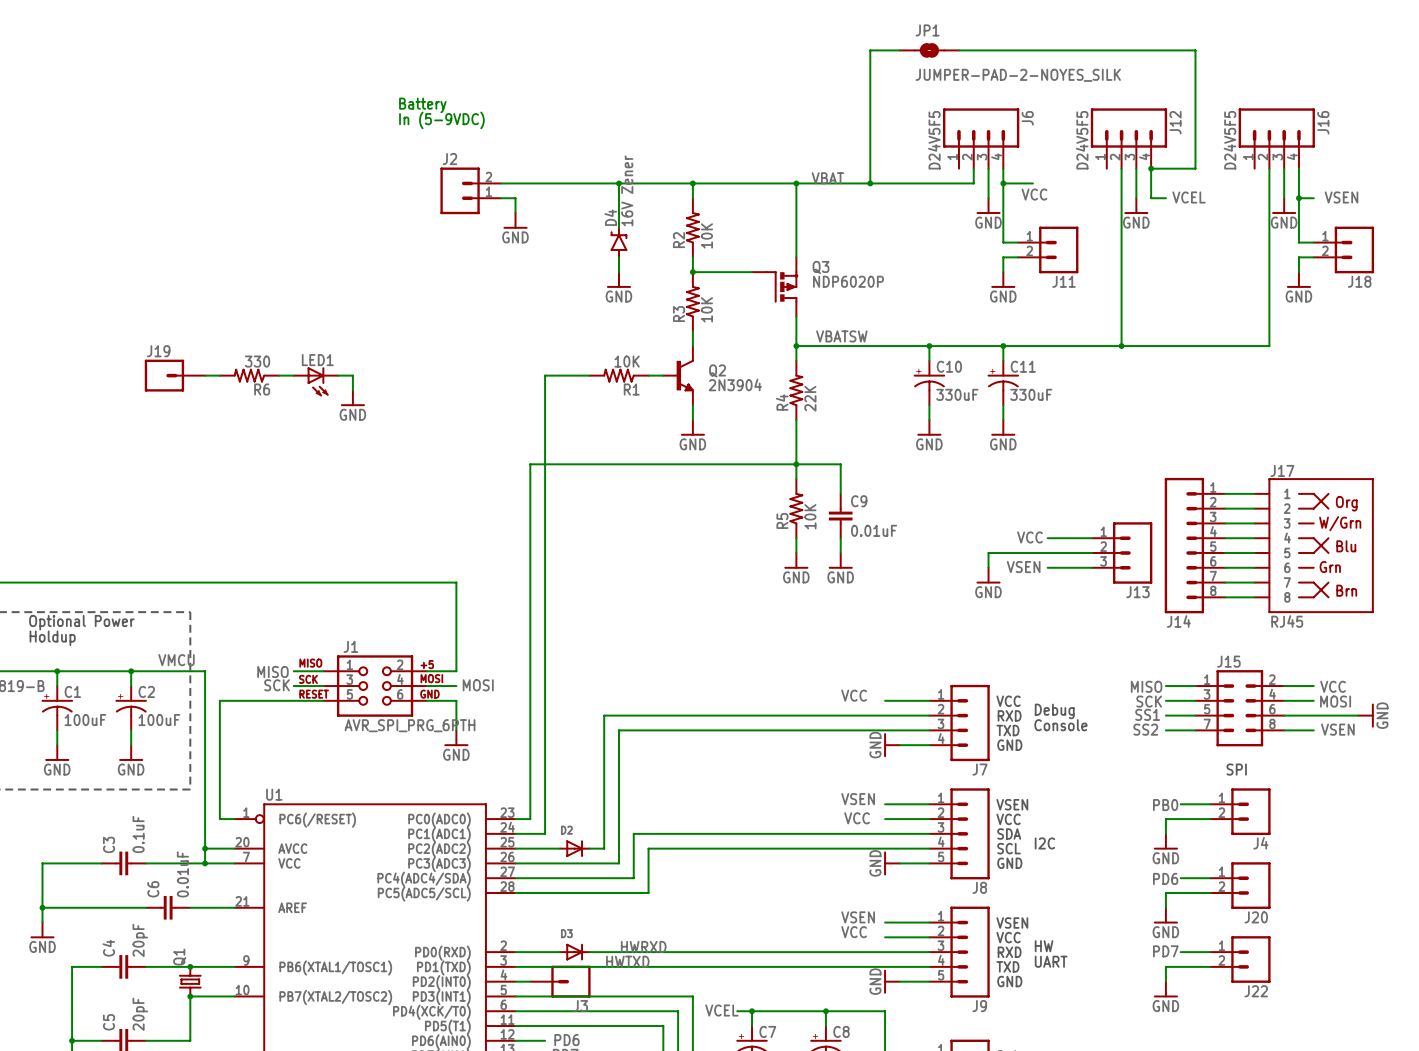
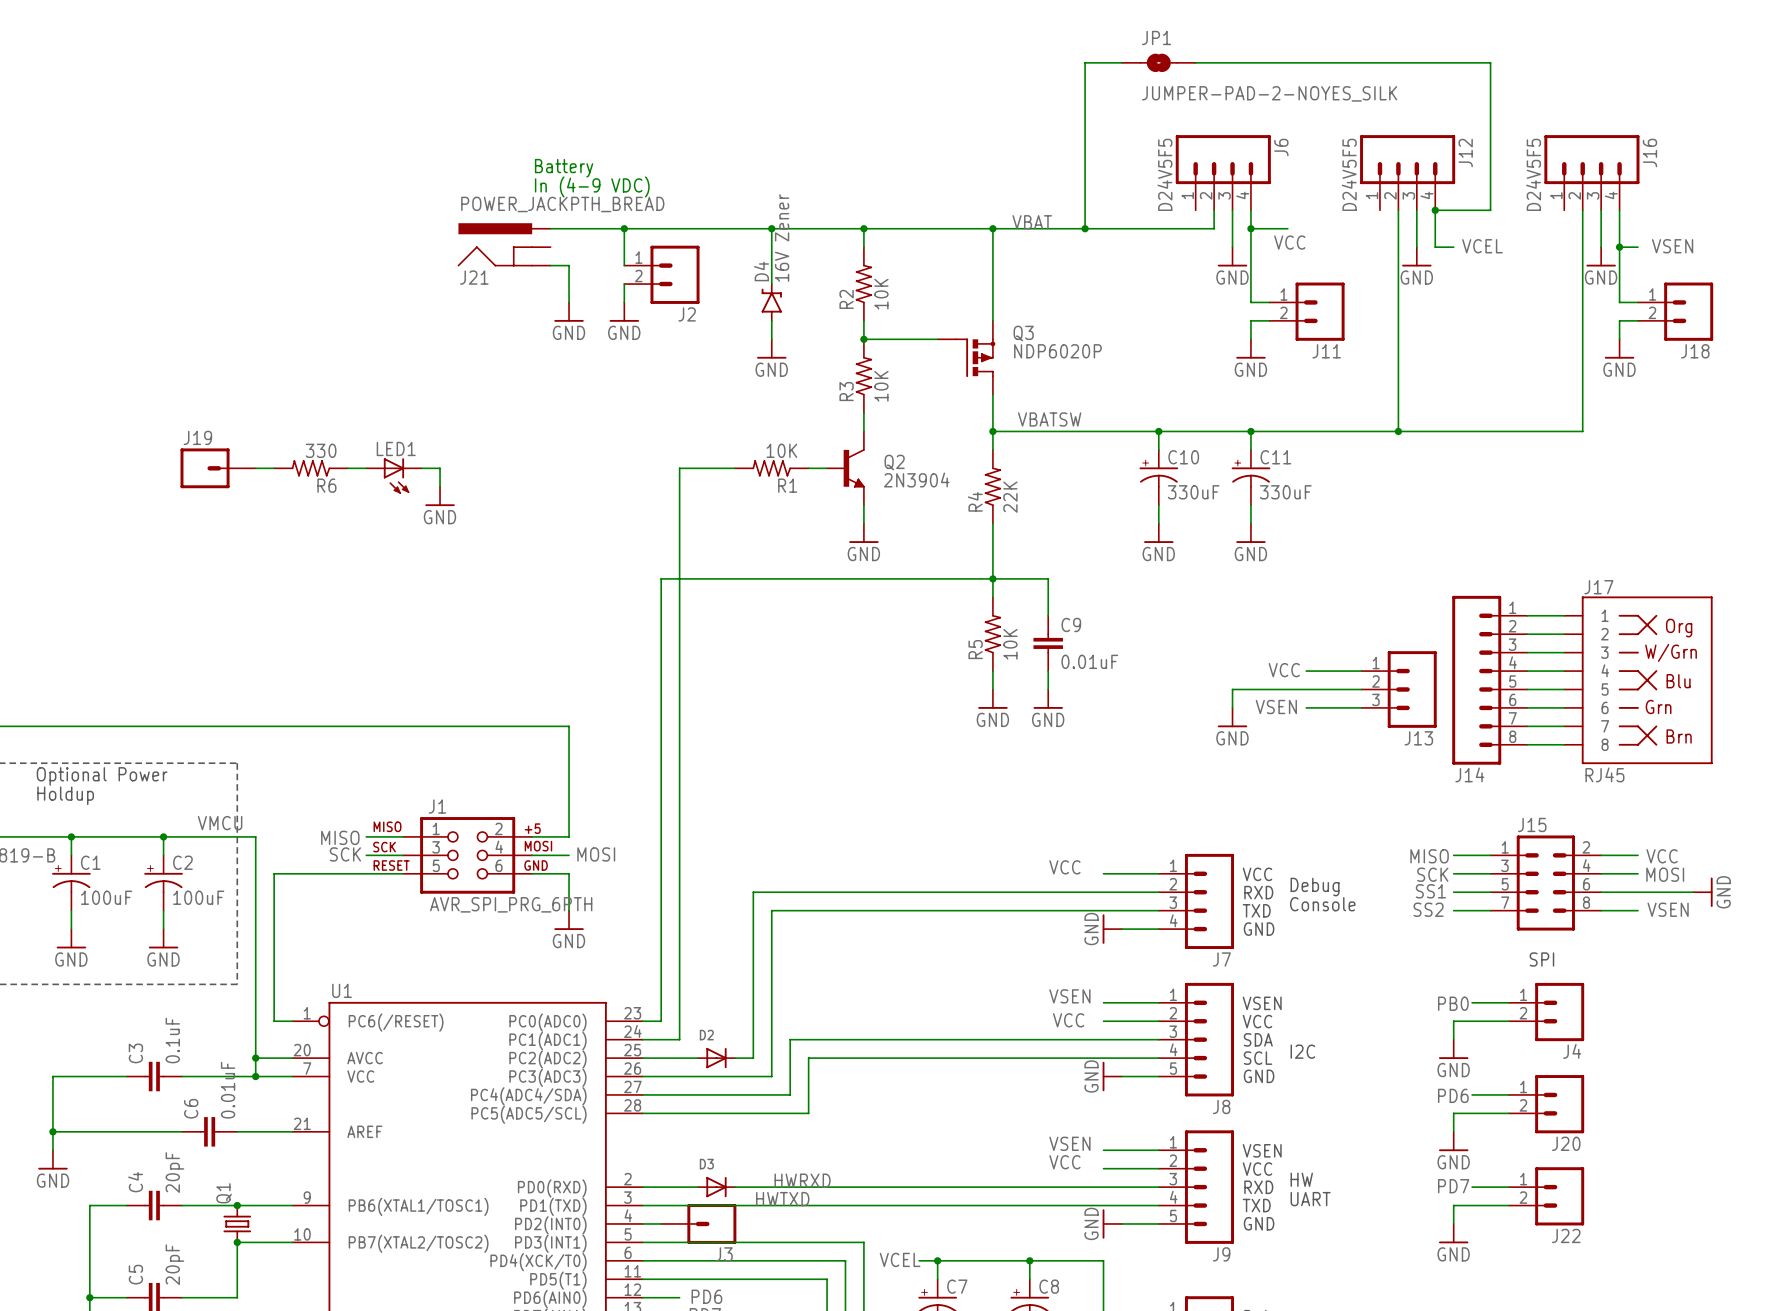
text position: Battery (422, 105) -> Battery (564, 168)
text: In (5-9VDC) (441, 120) -> none
text: none -> In (4-9 VDC) (592, 186)
wire: none -> (550, 228) (624, 228) (624, 265)
junction: none -> (624, 228)
J2 rotation: 0° (460, 190) -> 180° (675, 274)
J2 position: (470, 190) -> (661, 274)
J21: none -> POWER_JACKPTH_BREAD (504, 244)
wire: (500, 198) (515, 198) (515, 213) -> none
wire: none -> (550, 265) (569, 265) (569, 302)
power symbol: GND (515, 220) -> none
wire: none -> (624, 284) (624, 302)
power symbol: none -> GND (569, 312)
power symbol: none -> GND (624, 312)

